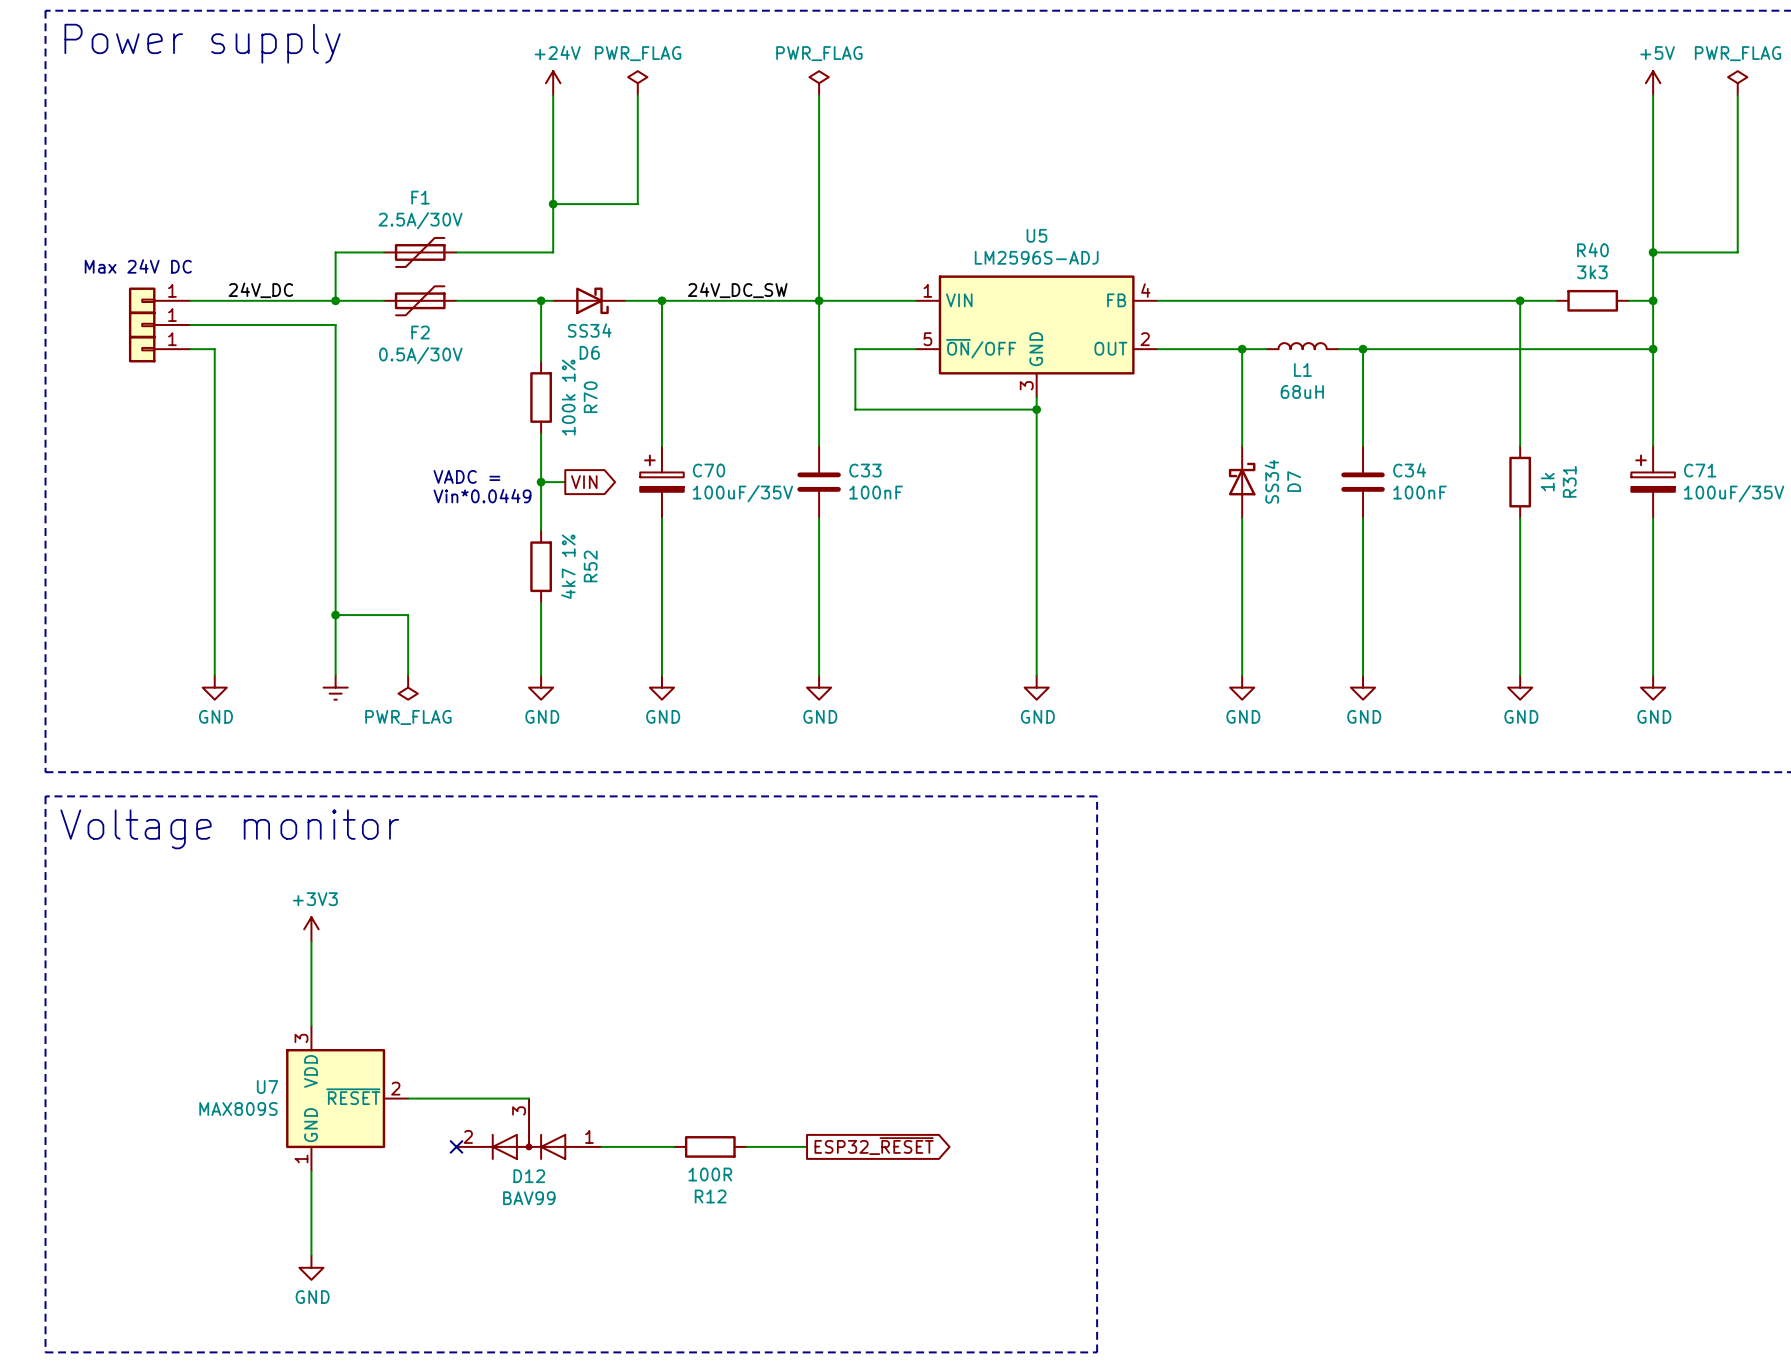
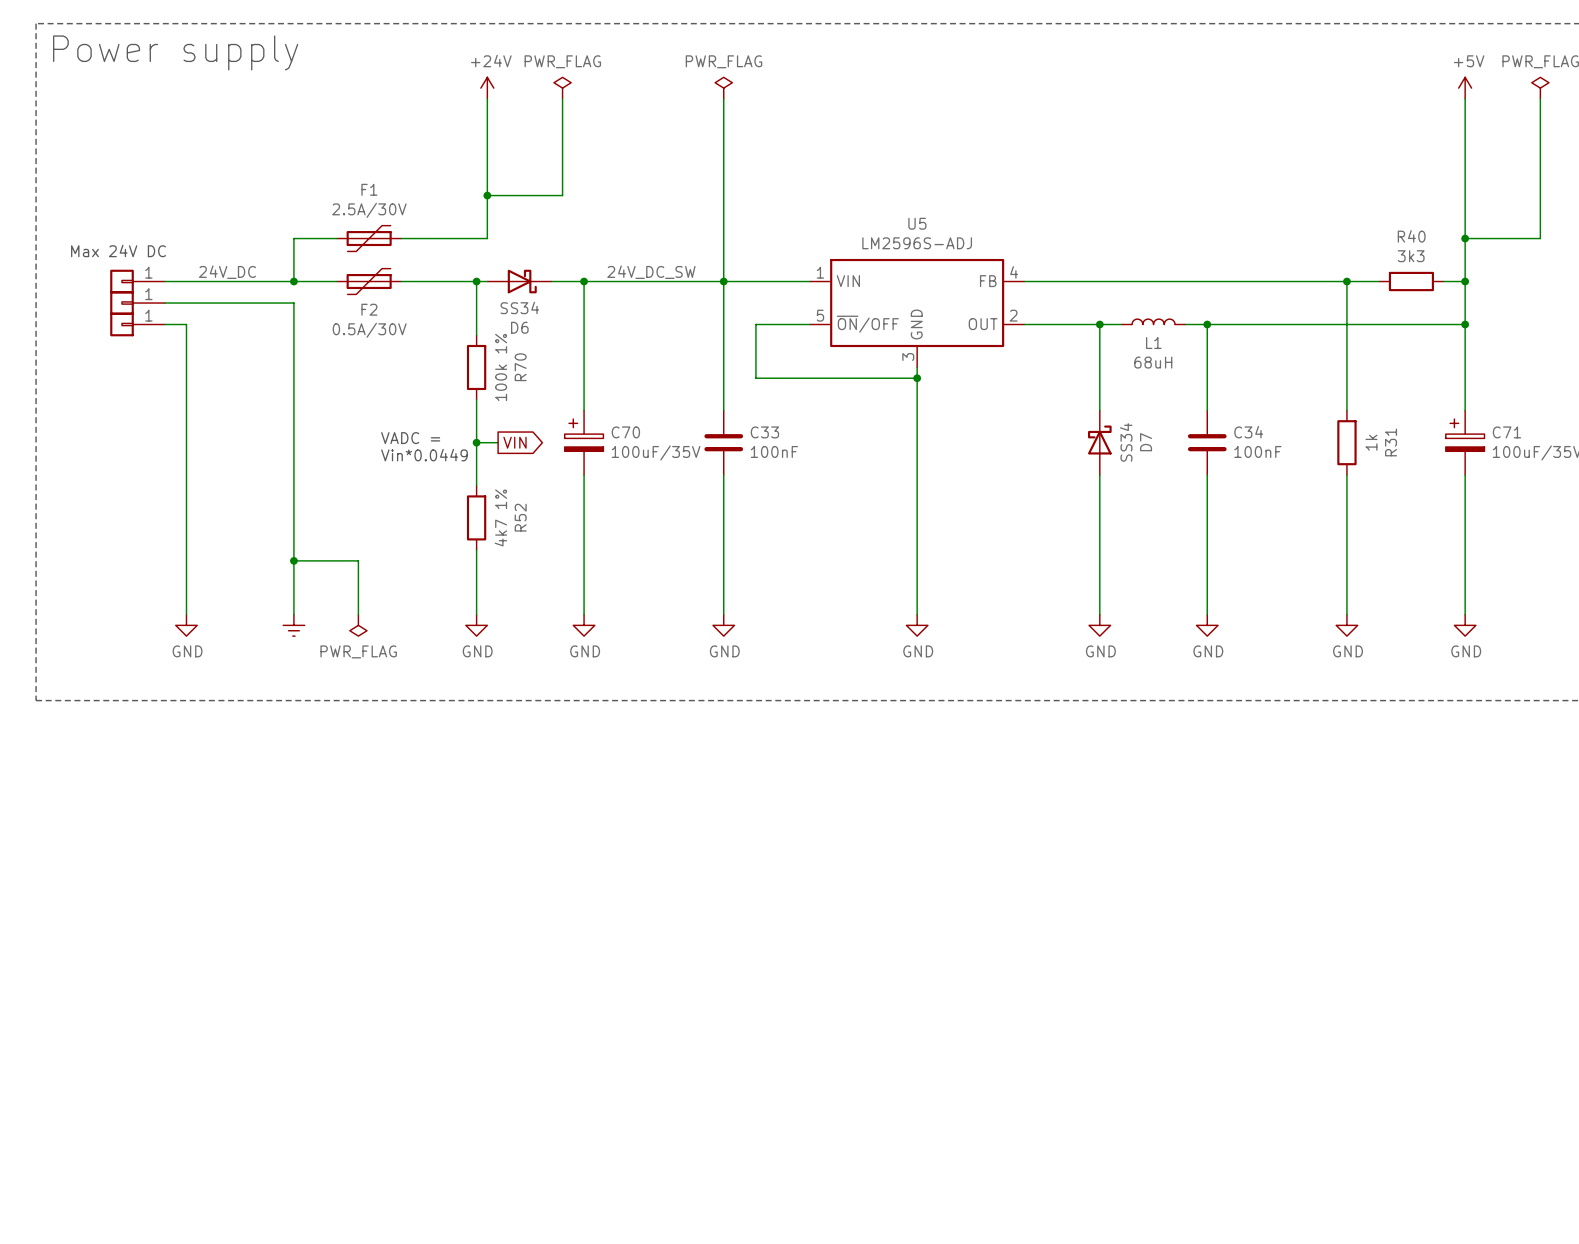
line: (45, 796) (45, 1352) (1097, 1352) (1097, 796) (45, 796) -> none
text: Voltage monitor (229, 829) -> none
power symbol: +3V3 (311, 929) -> none
wire: (311, 941) (311, 1026) -> none
U7: MAX809S (347, 1098) -> none
wire: (408, 1098) (529, 1098) -> none
D12: BAV99 (529, 1129) -> none
no-connect mark: (456, 1146) -> none
wire: (601, 1146) (674, 1146) -> none
R12: 100R (710, 1146) -> none
wire: (746, 1146) (807, 1146) -> none
global label: ESP32_~{RESET} (874, 1146) -> none
wire: (311, 1171) (311, 1255) -> none
power symbol: GND (311, 1267) -> none

